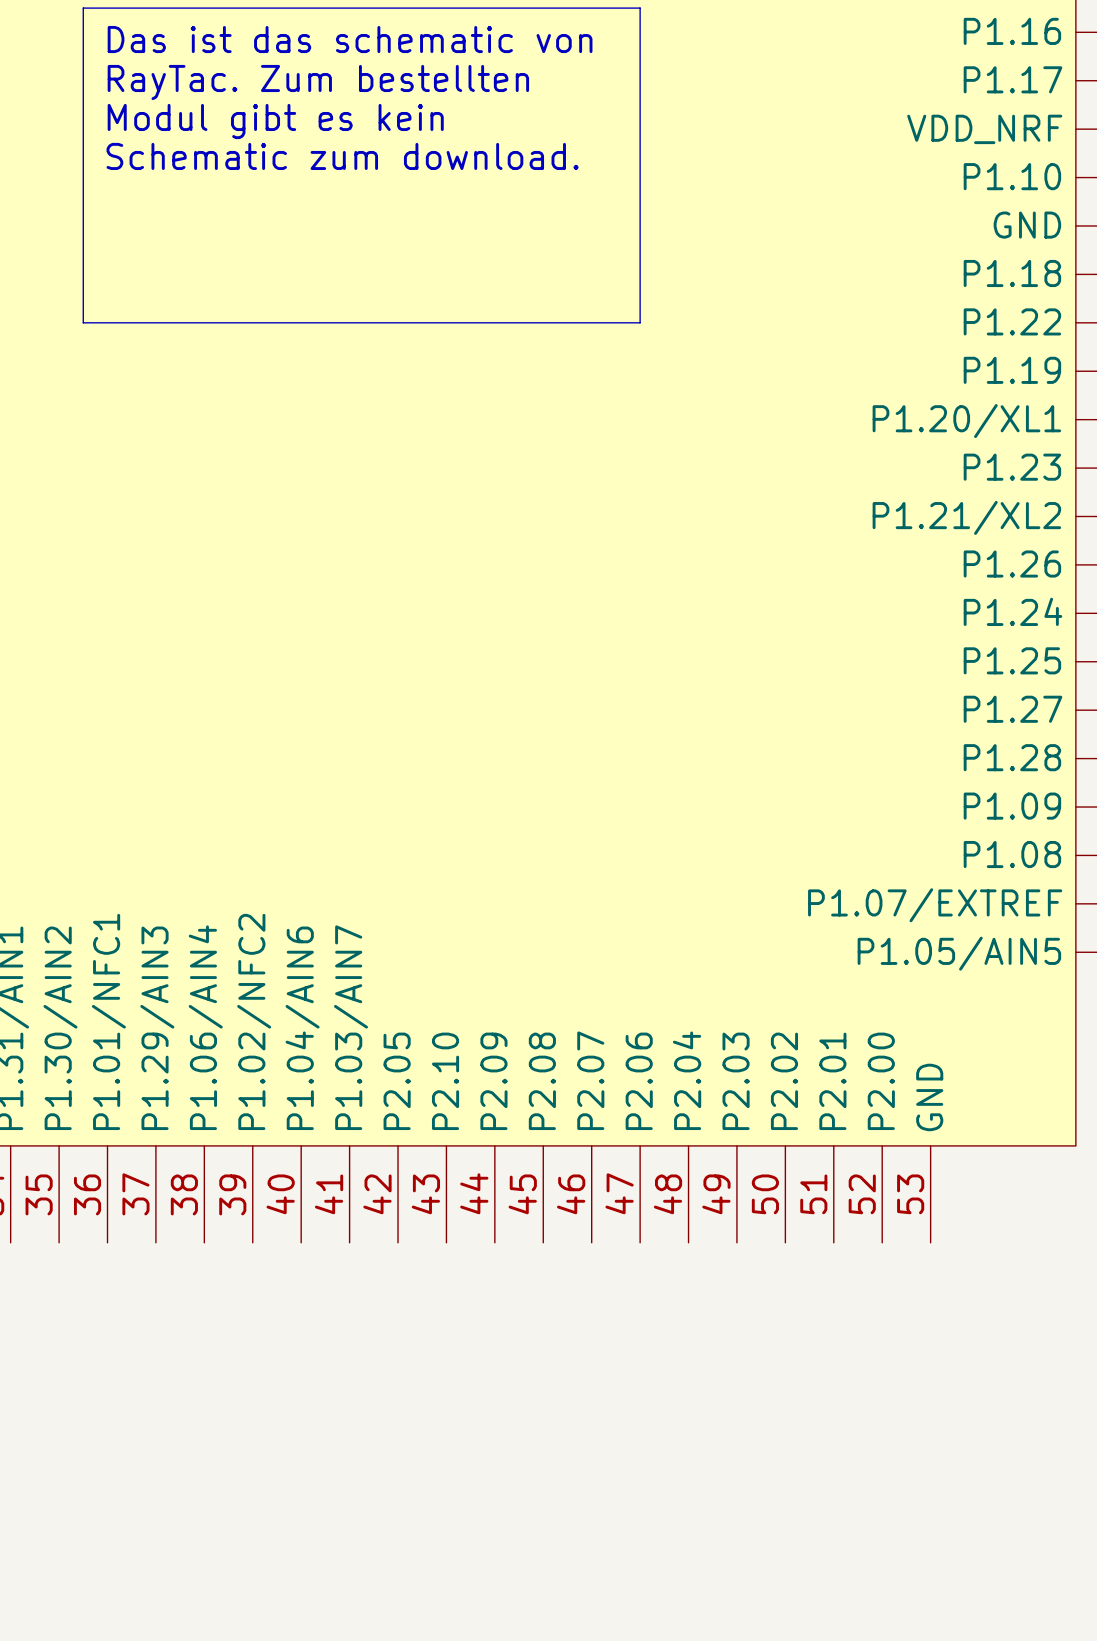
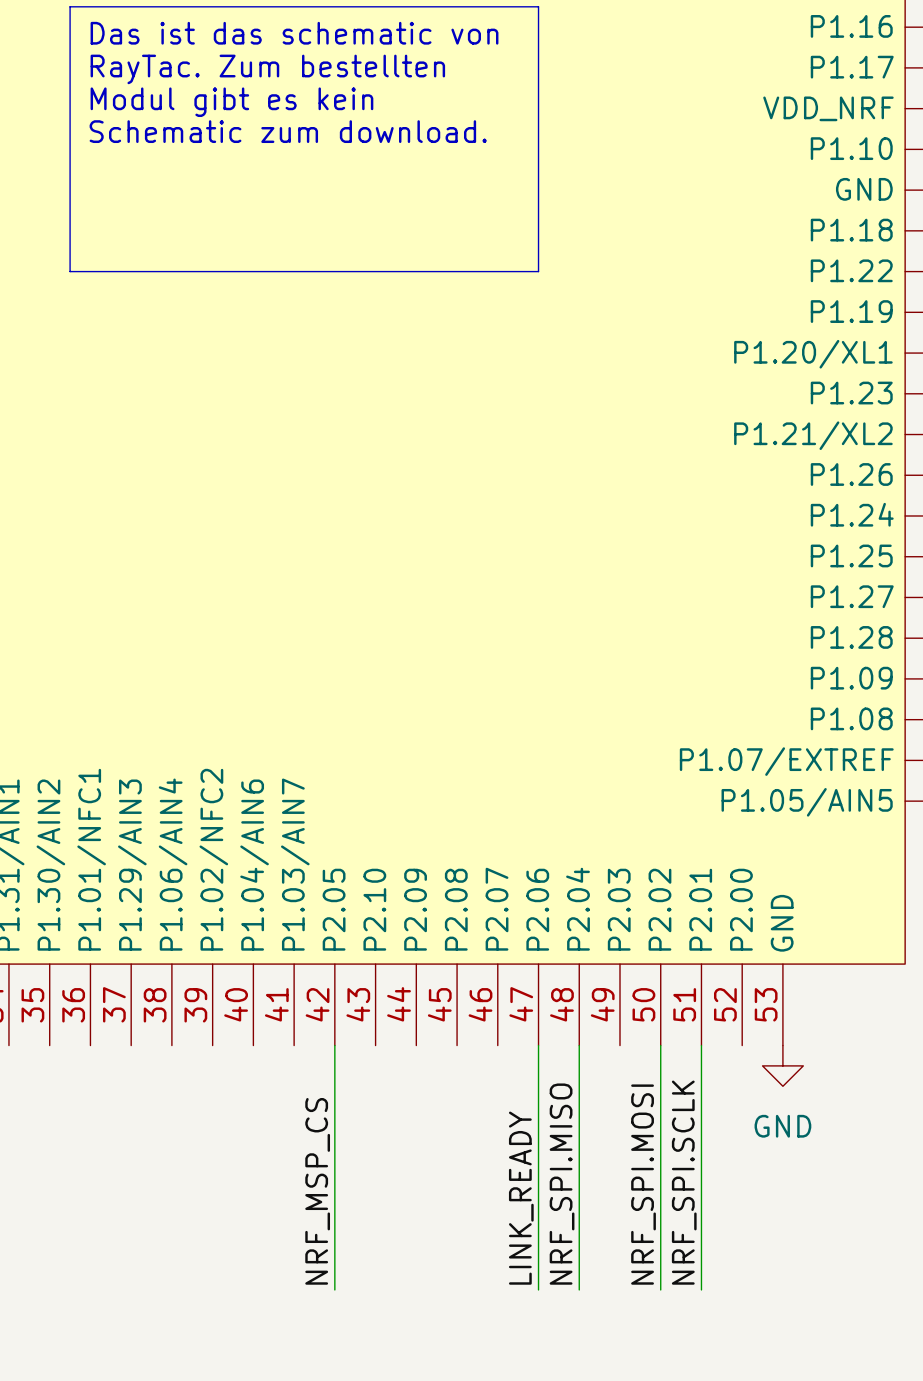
wire: none -> (334, 1045) (334, 1289)
wire: none -> (538, 1045) (538, 1289)
wire: none -> (579, 1045) (579, 1289)
wire: none -> (660, 1045) (660, 1289)
wire: none -> (701, 1045) (701, 1289)
power symbol: none -> GND (782, 1065)
label: none -> NRF_SPI.SCLK (684, 1182)
label: none -> NRF_SPI.MISO (562, 1184)
label: none -> NRF_SPI.MOSI (643, 1184)
label: none -> NRF_MSP_CS (317, 1191)
label: none -> LINK_READY (521, 1198)

